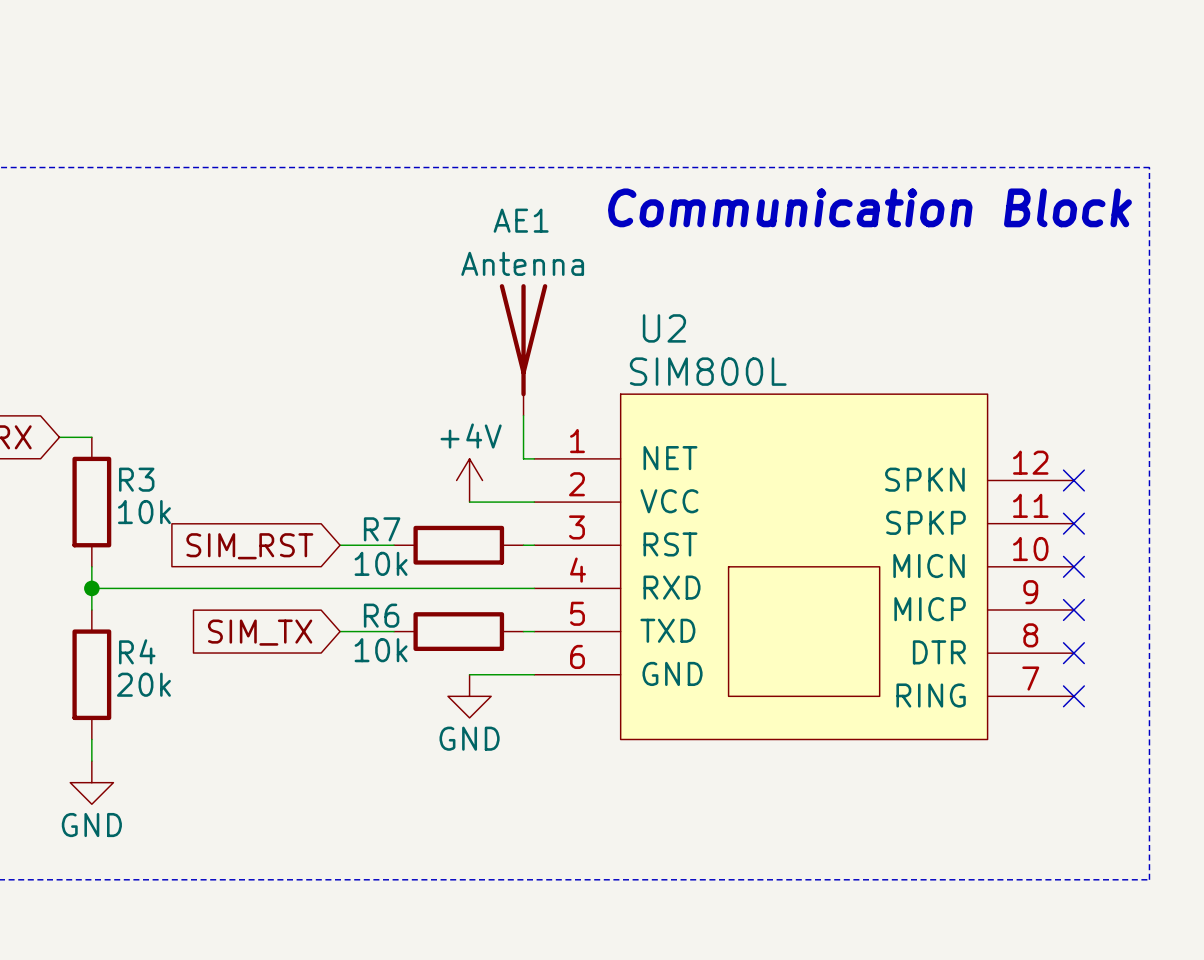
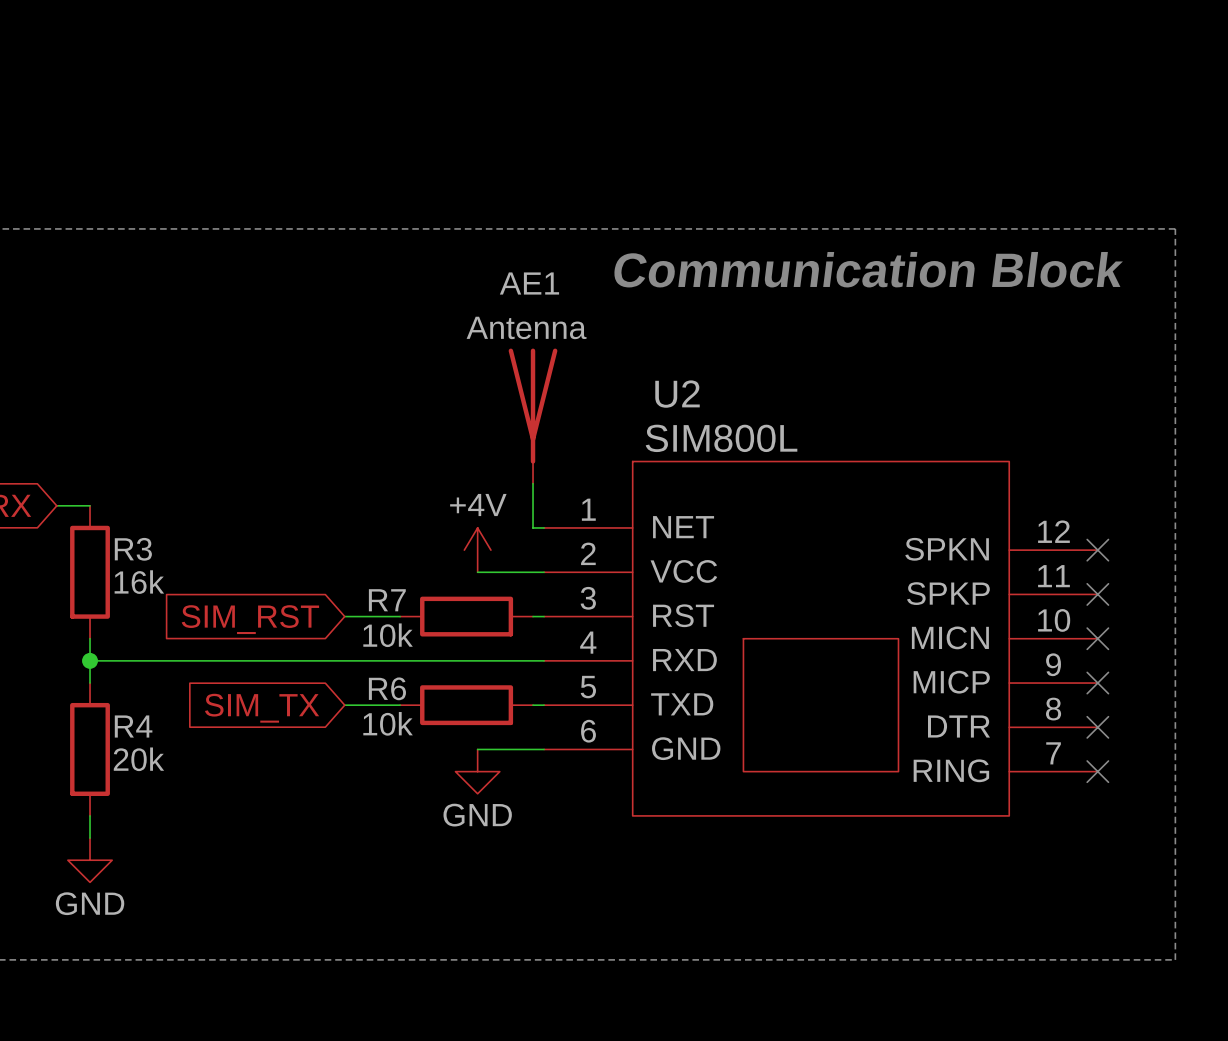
R3 value: 10k (144, 512) -> 16k (139, 582)

